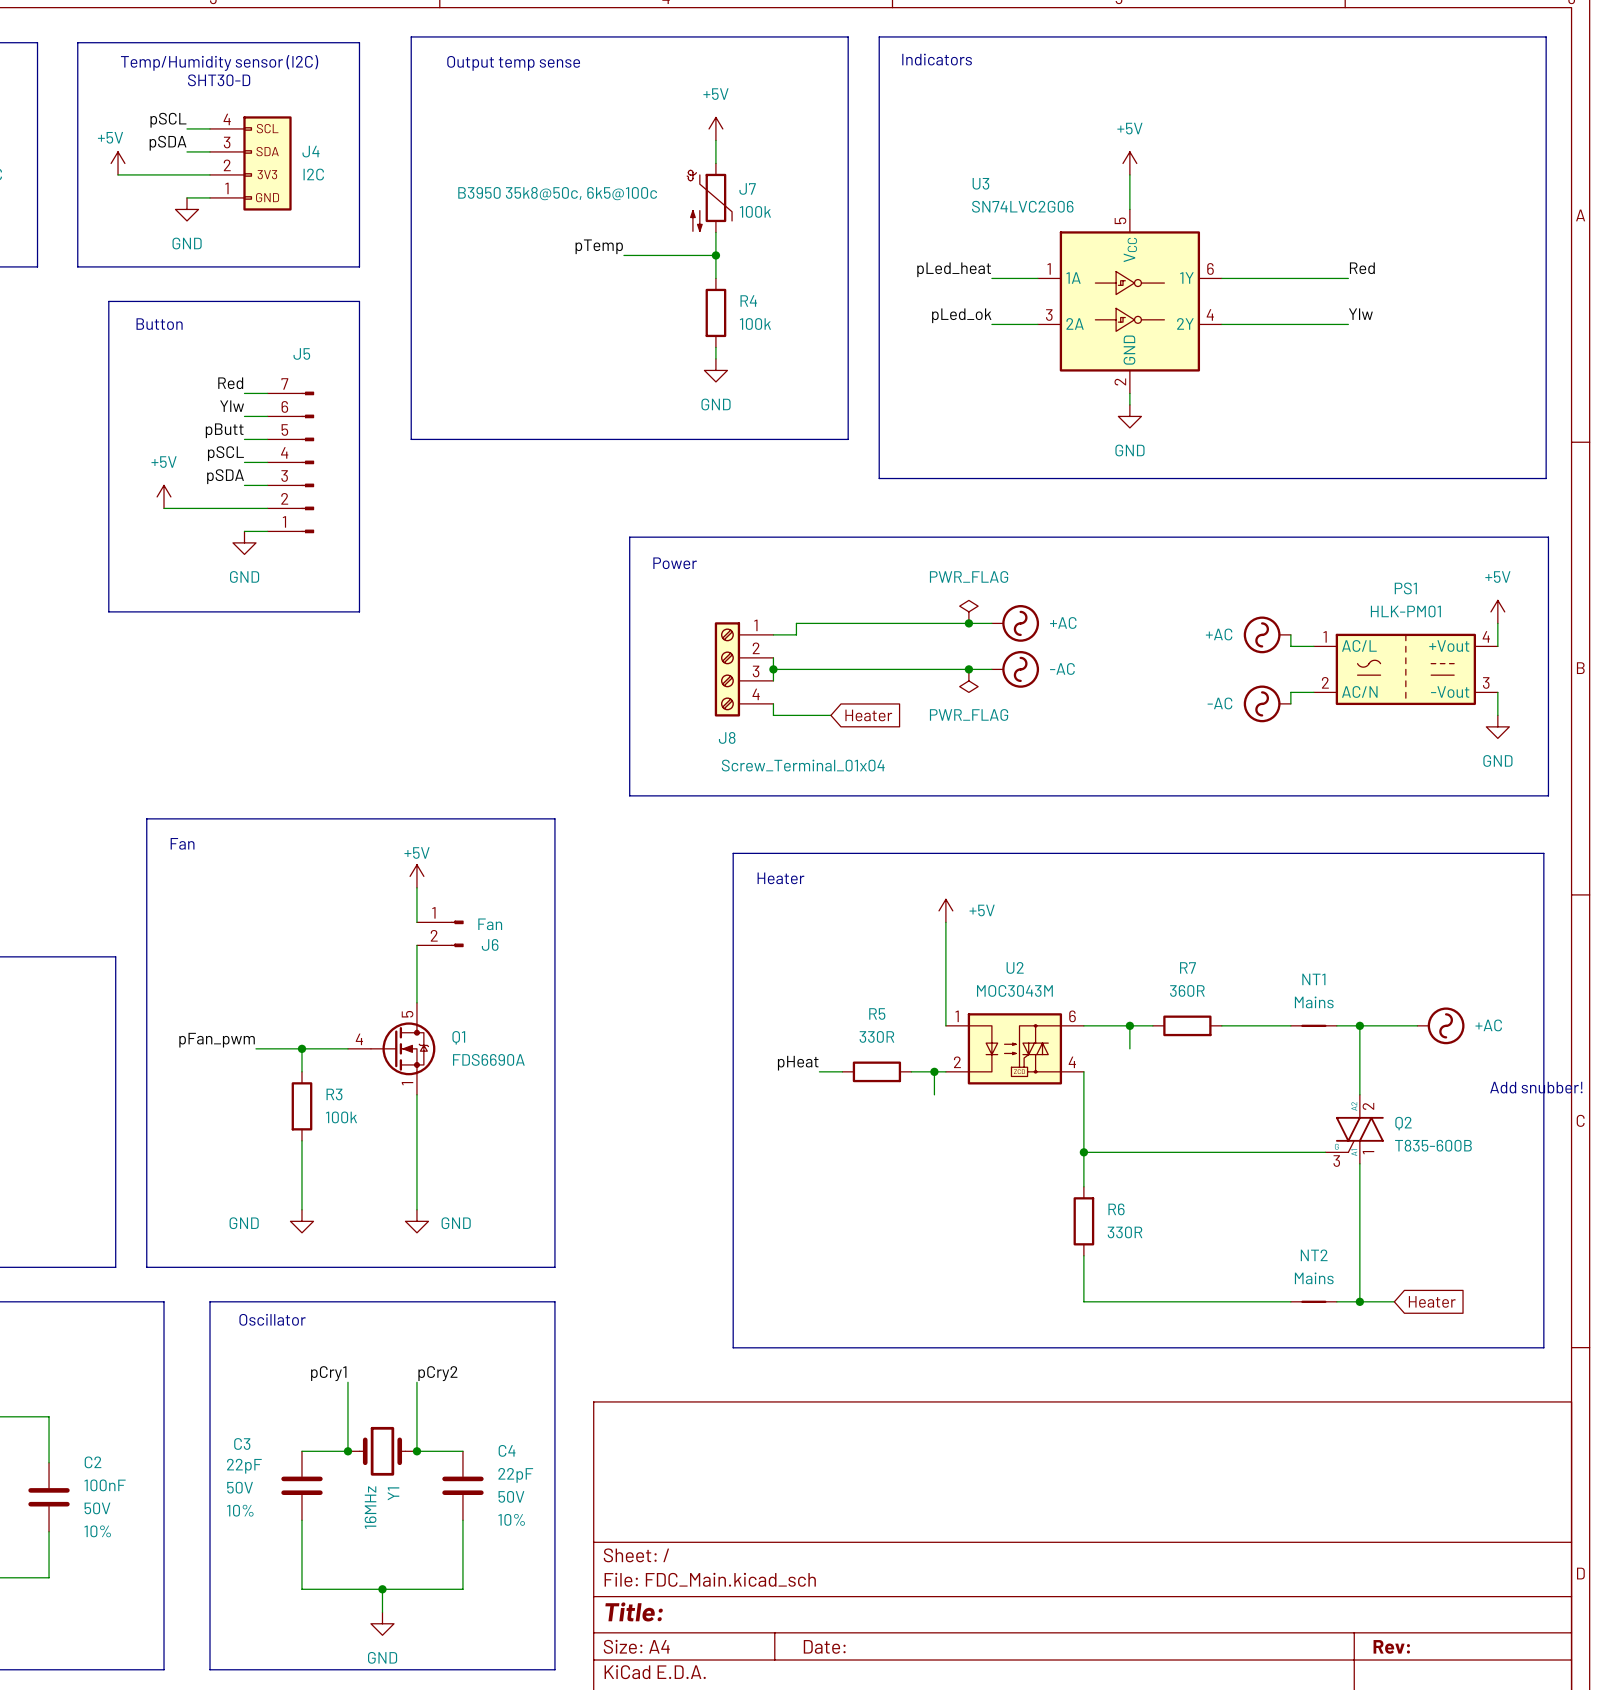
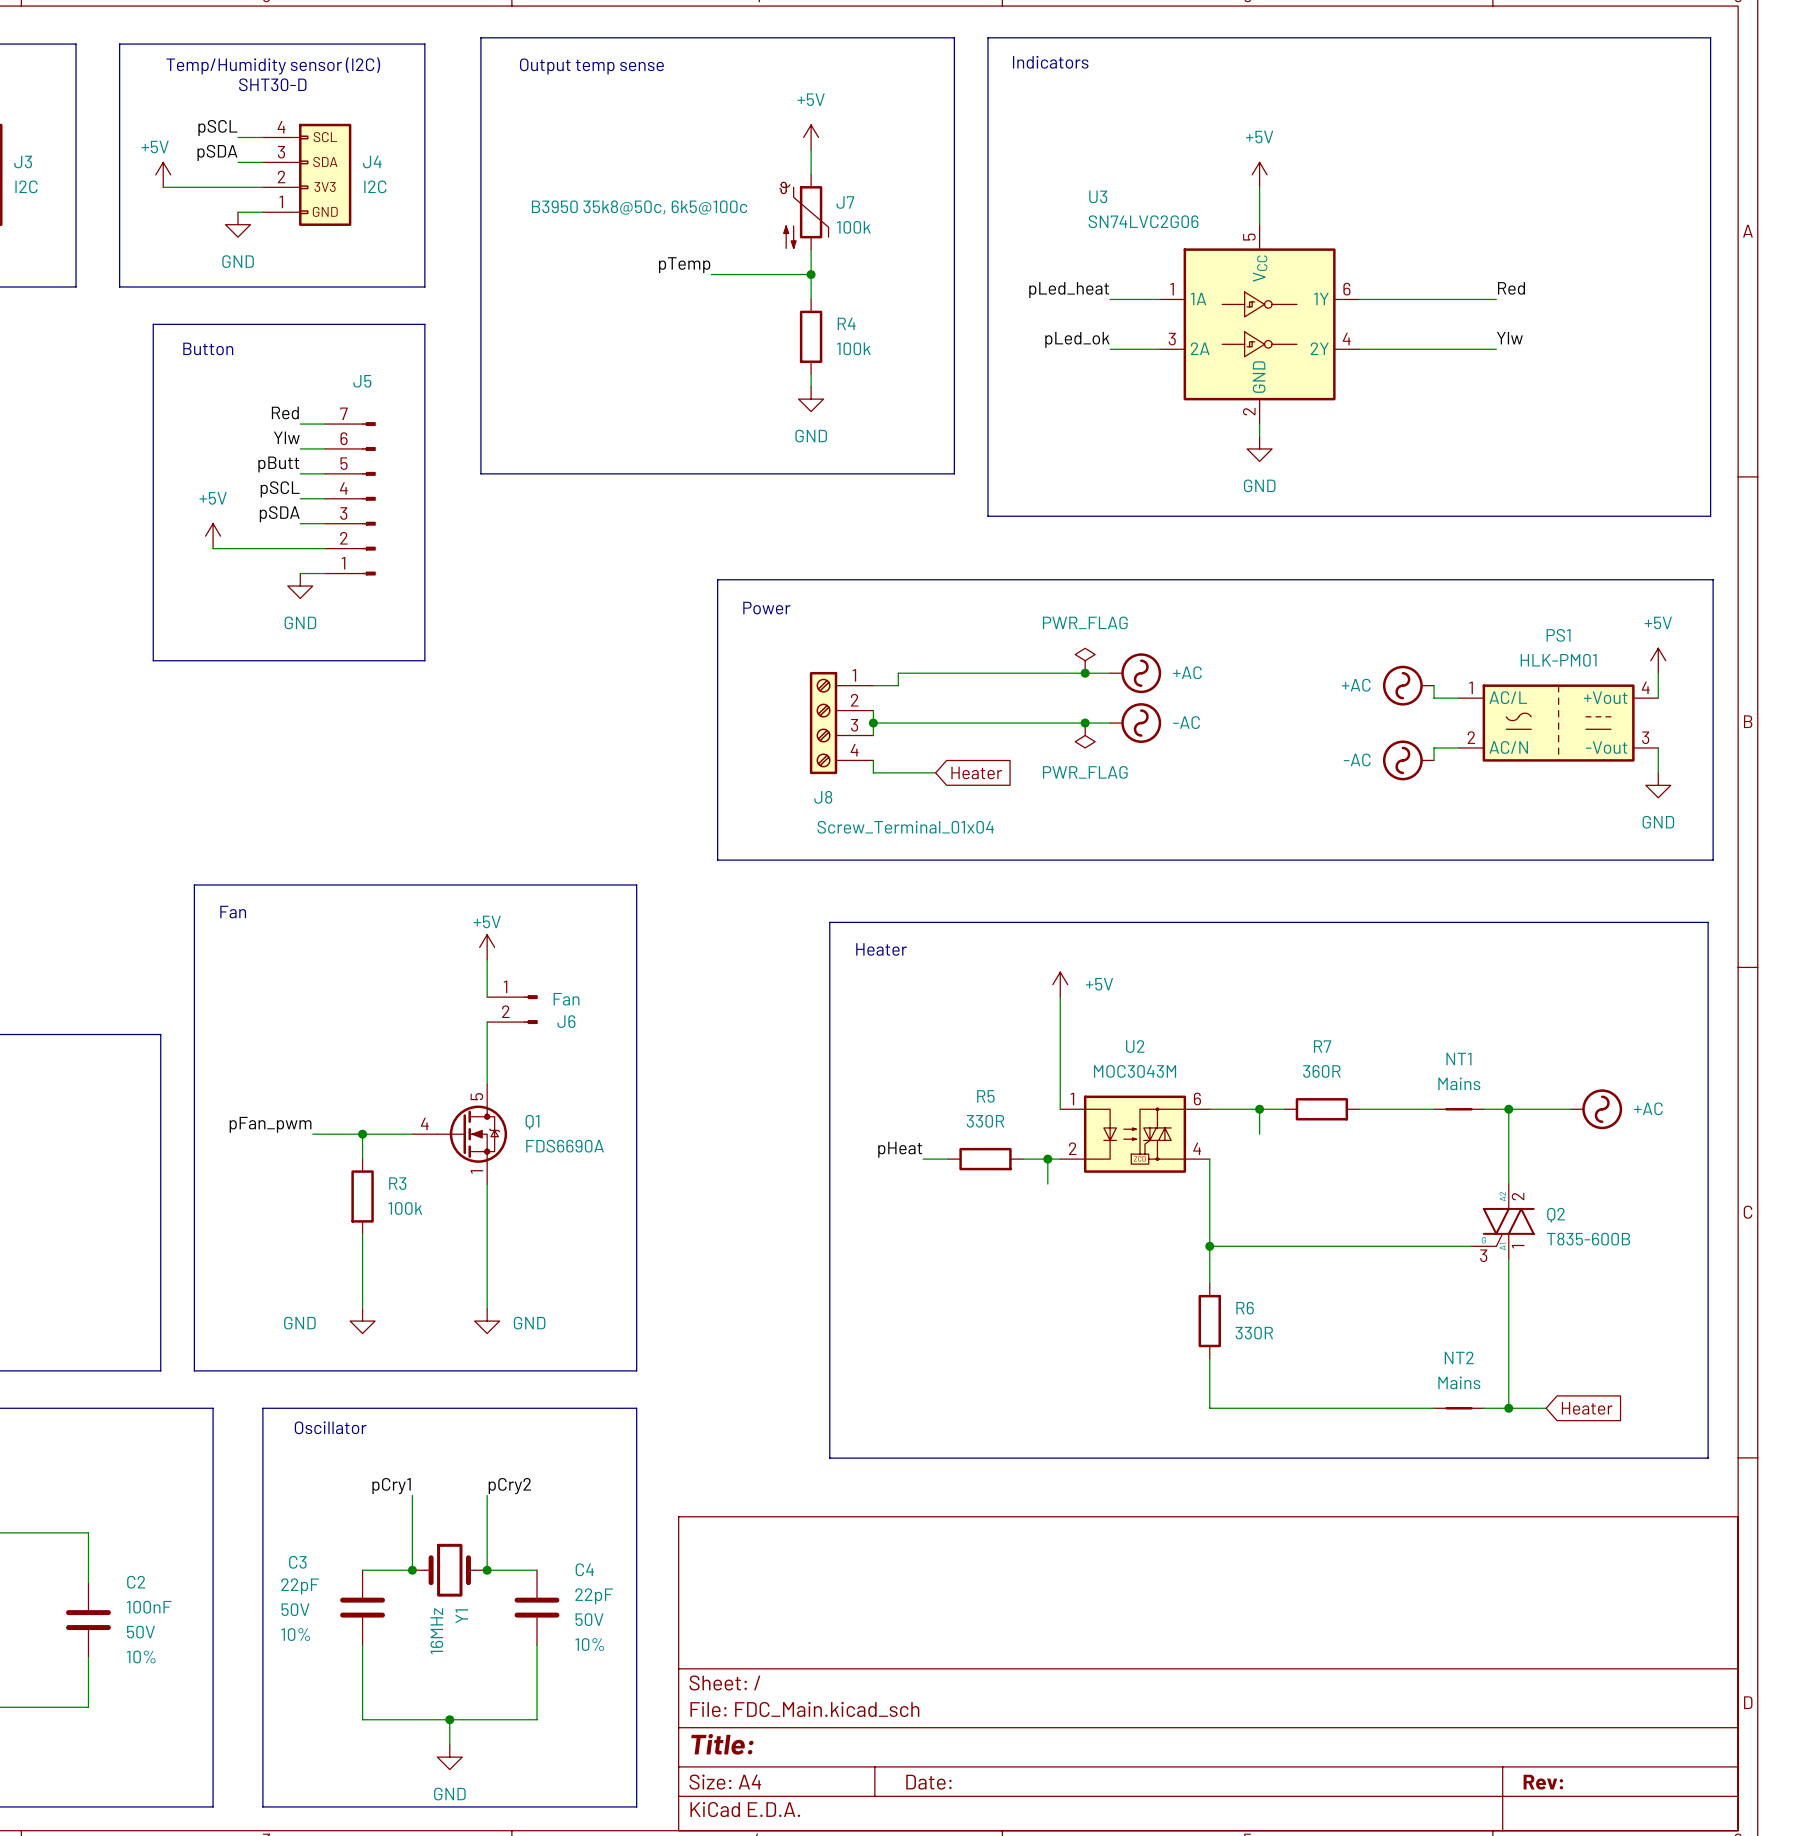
text: Add snubber! (1536, 1087) -> none

